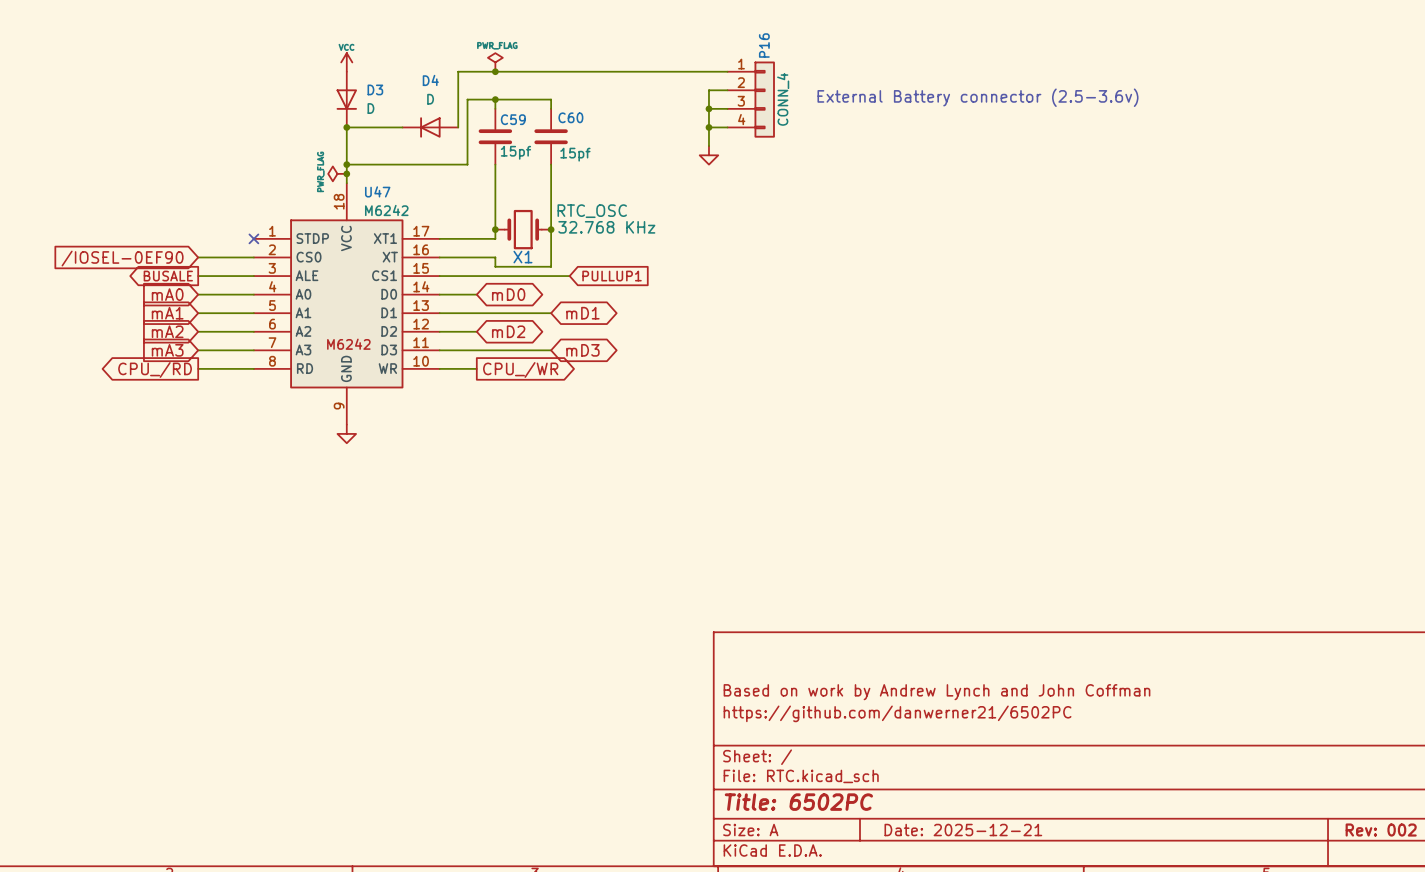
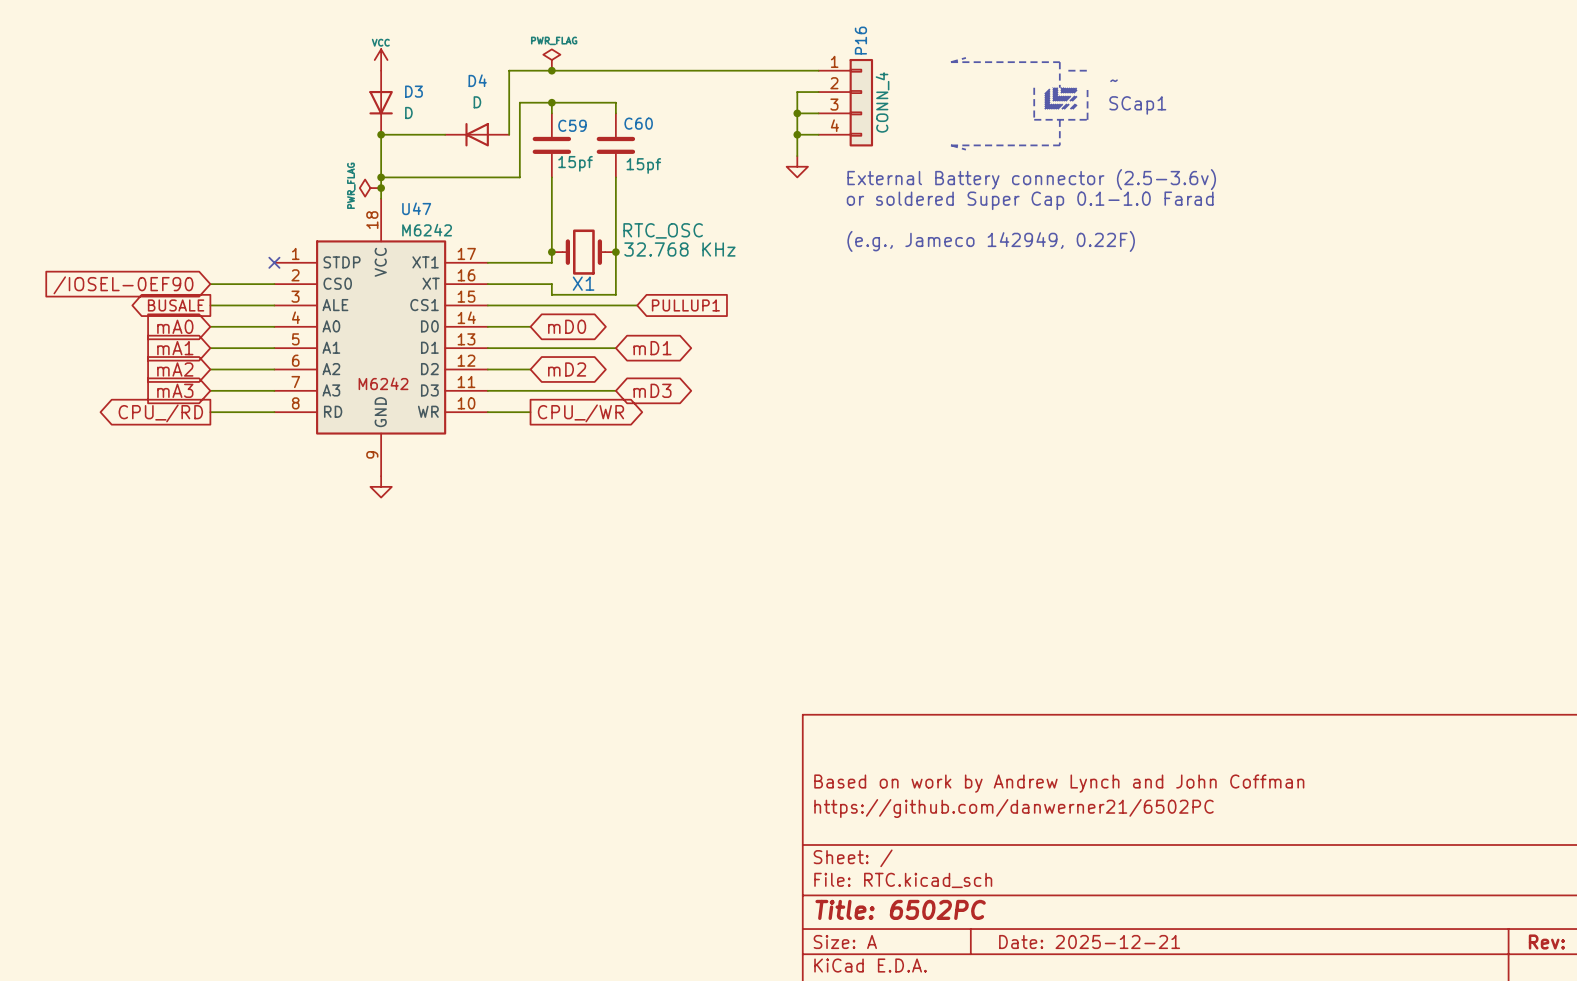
line: none -> (965, 57) (950, 62) (1059, 62) (1059, 87) (1044, 102)
line: none -> (1068, 70) (1089, 70)
text: none -> ~ (1114, 80)
line: none -> (1034, 87) (1034, 119) (1087, 119) (1087, 87)
line: none -> (1051, 87) (1044, 94)
line: none -> (1053, 87) (1044, 96)
line: none -> (1055, 87) (1044, 98)
line: none -> (1057, 87) (1044, 100)
line: none -> (1061, 87) (1044, 104)
line: none -> (1064, 87) (1044, 106)
line: none -> (1066, 87) (1044, 109)
line: none -> (1068, 87) (1047, 109)
line: none -> (1070, 87) (1049, 109)
line: none -> (1072, 87) (1051, 109)
line: none -> (1074, 87) (1053, 109)
line: none -> (1076, 87) (1055, 109)
line: none -> (1076, 89) (1057, 109)
line: none -> (1076, 94) (1061, 109)
line: none -> (1076, 96) (1064, 109)
text position: External Battery connector (2.5-3.6v) (977, 97) -> External Battery connector (2.5-3.6v) (1031, 179)
line: none -> (1076, 102) (1070, 109)
line: none -> (1076, 104) (1072, 109)
text: none -> SCap1 (1137, 105)
line: none -> (1059, 119) (1059, 145) (950, 145) (965, 149)
text: none -> or soldered Super Cap 0.1-1.0 Farad (1030, 200)
text: none -> (e.g., Jameco 142949, 0.22F) (991, 241)

